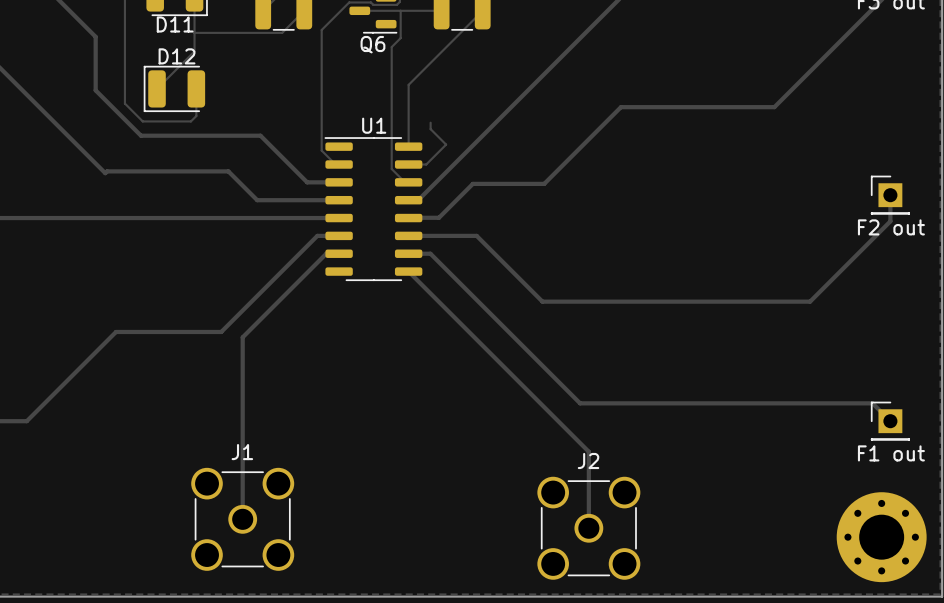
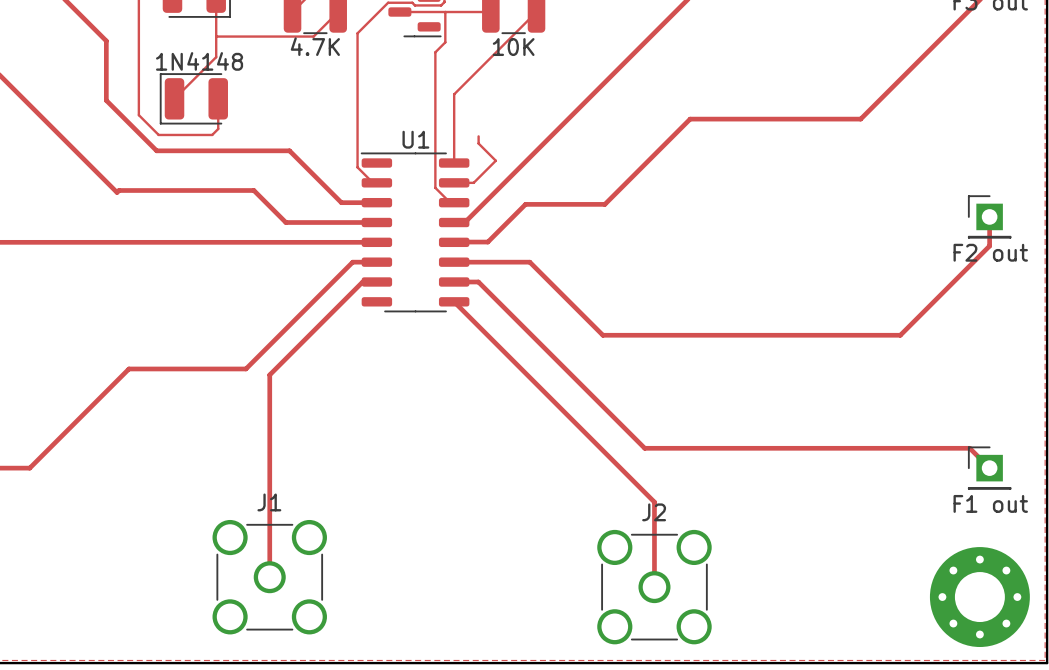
D11 name: D11 (175, 24) -> none
part value: none -> 4.7K (315, 46)
part value: none -> 10K (513, 47)
Q6 name: Q6 (372, 44) -> none
D12 value: none -> 1N4148 (199, 61)
D12 name: D12 (177, 56) -> none

